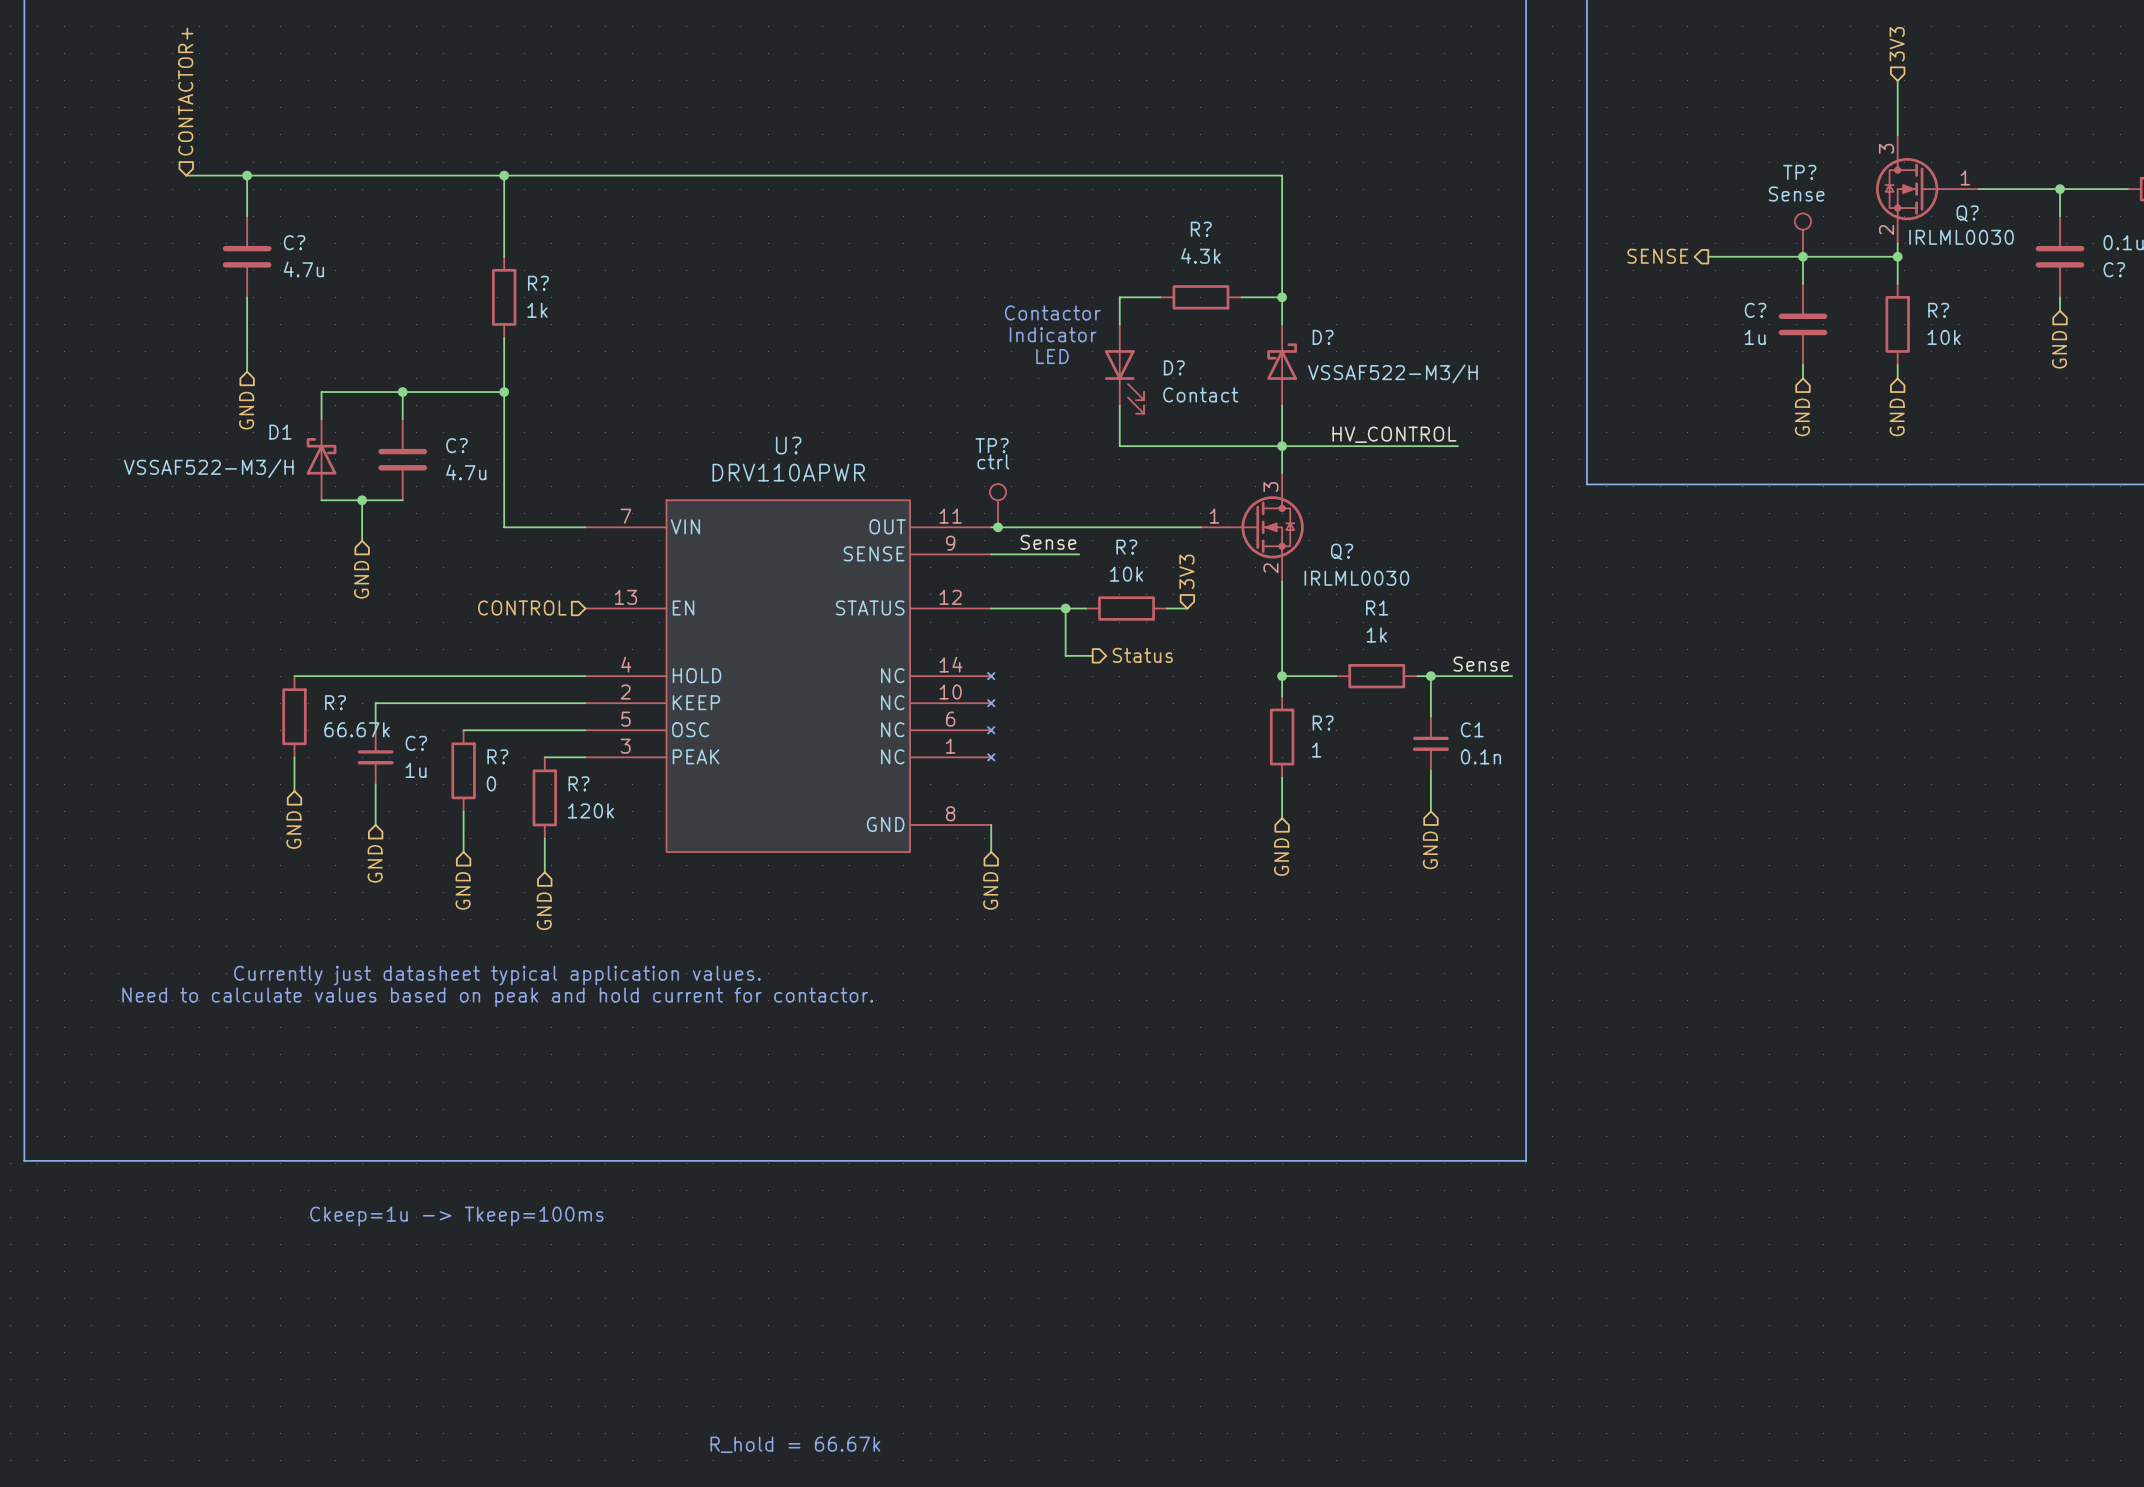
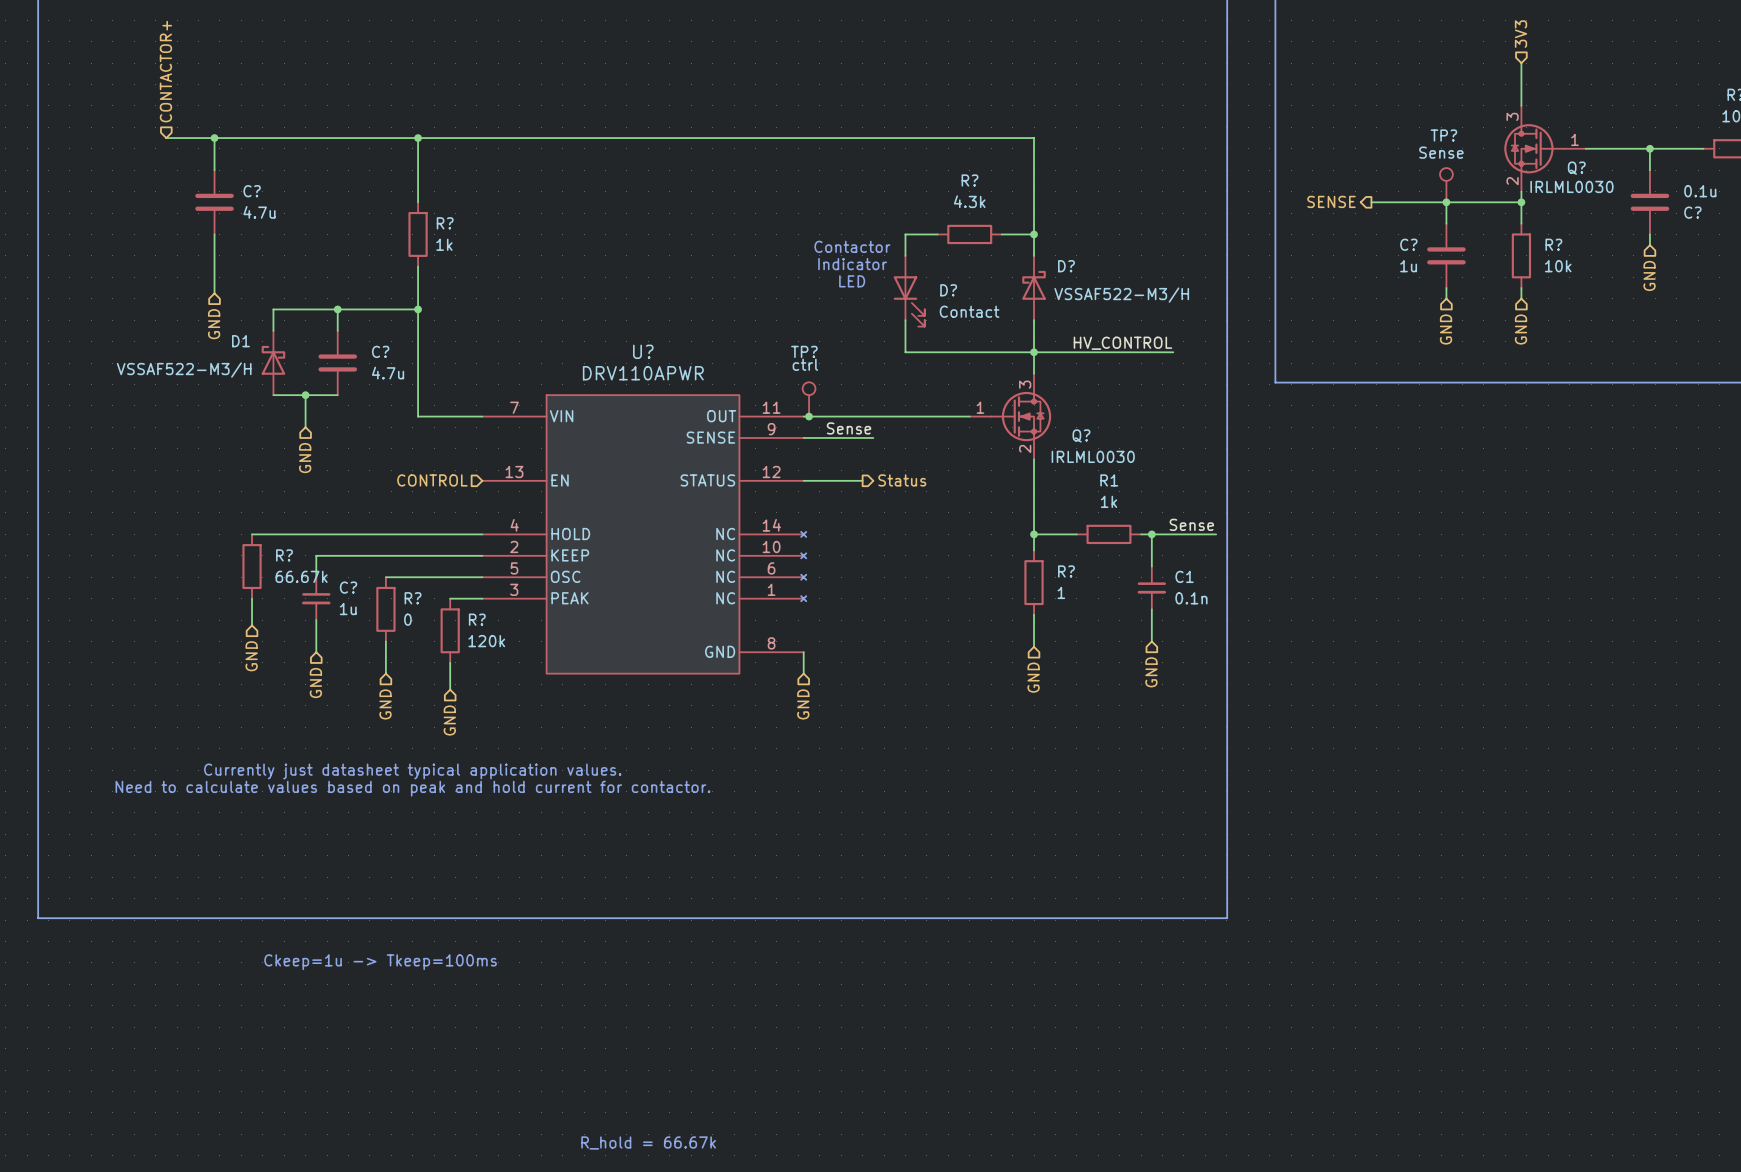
hierarchical label: 3V3 (1186, 571) -> none
junction: (1065, 608) -> none
wire: (1085, 608) (1065, 608) (1065, 655) (1092, 655) -> none
R?: 10k (1126, 608) -> none
wire: (1167, 608) (1187, 608) -> none
hierarchical label position: Status (1142, 655) -> Status (902, 480)

